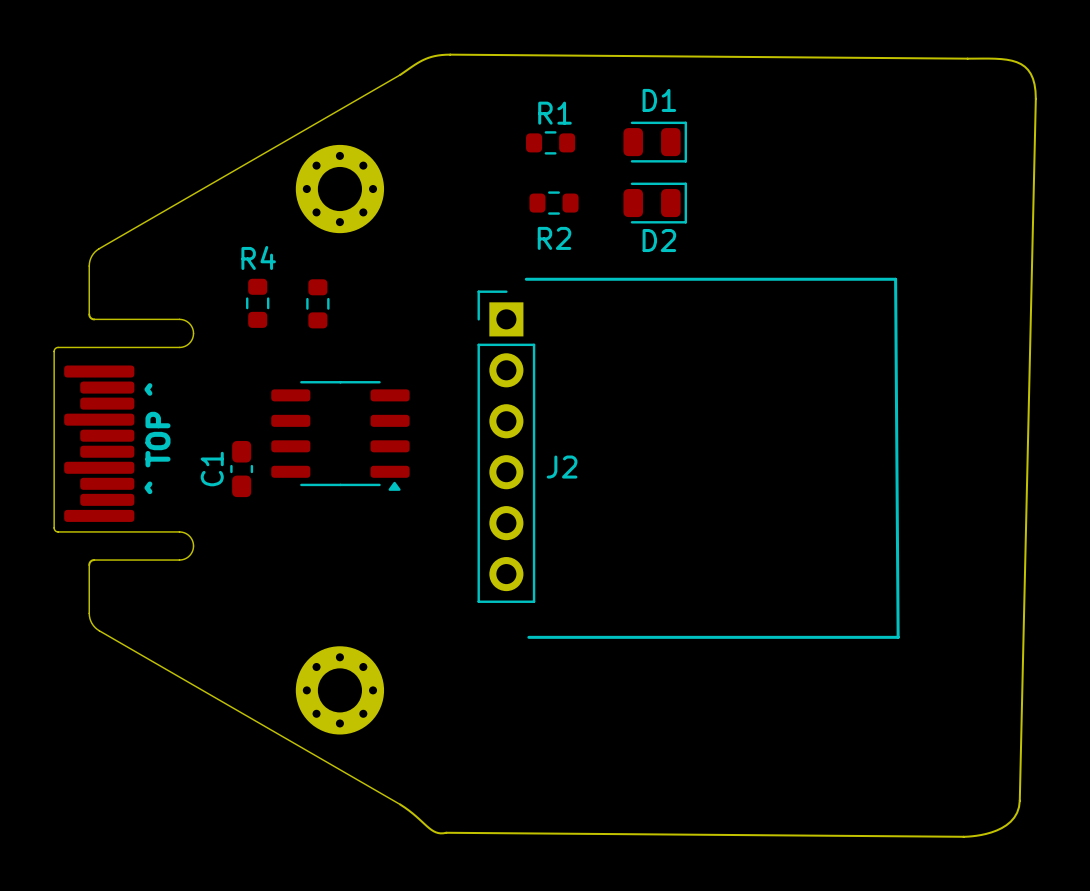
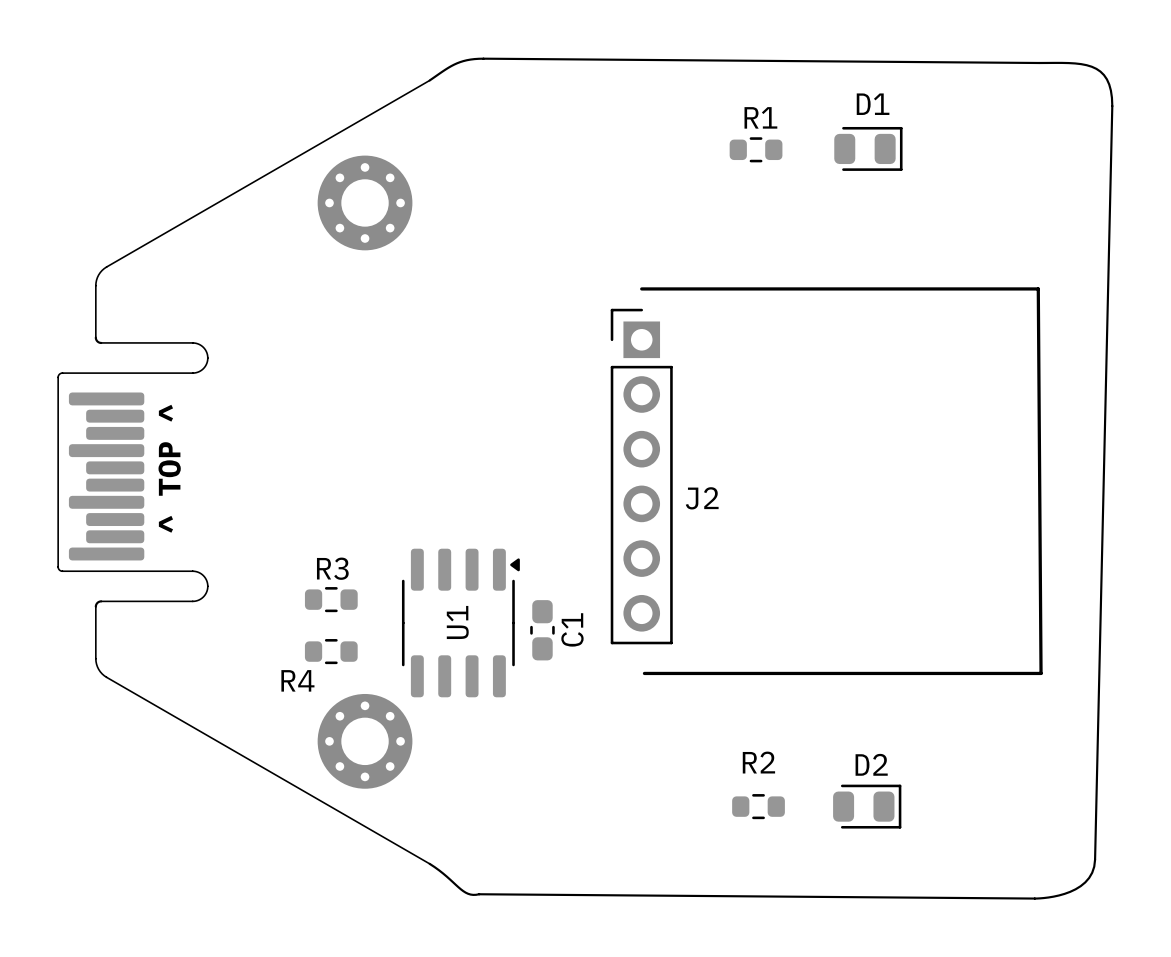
R1 position: (550, 142) -> (756, 149)
D1 position: (655, 142) -> (868, 148)
R2 position: (554, 203) -> (758, 806)
D2 position: (655, 203) -> (867, 806)
R2 name position: R2 (554, 238) -> R2 (758, 762)
D2 name position: D2 (659, 240) -> D2 (871, 764)
R4 name position: R4 (258, 257) -> R4 (297, 680)
line: (526, 279) (895, 279) (898, 637) (528, 637) -> (641, 288) (1038, 288) (1041, 673) (644, 673)
R4 rotation: 0° (257, 303) -> 90° clockwise (331, 651)
R4 position: (257, 303) -> (331, 651)
part: (317, 303) -> none
part: (340, 435) -> none
J2 position: (506, 446) -> (641, 476)
C1 name position: C1 (212, 469) -> C1 (572, 629)
C1 position: (241, 469) -> (542, 630)
R3: none -> (331, 599)
U1: none -> (460, 622)

